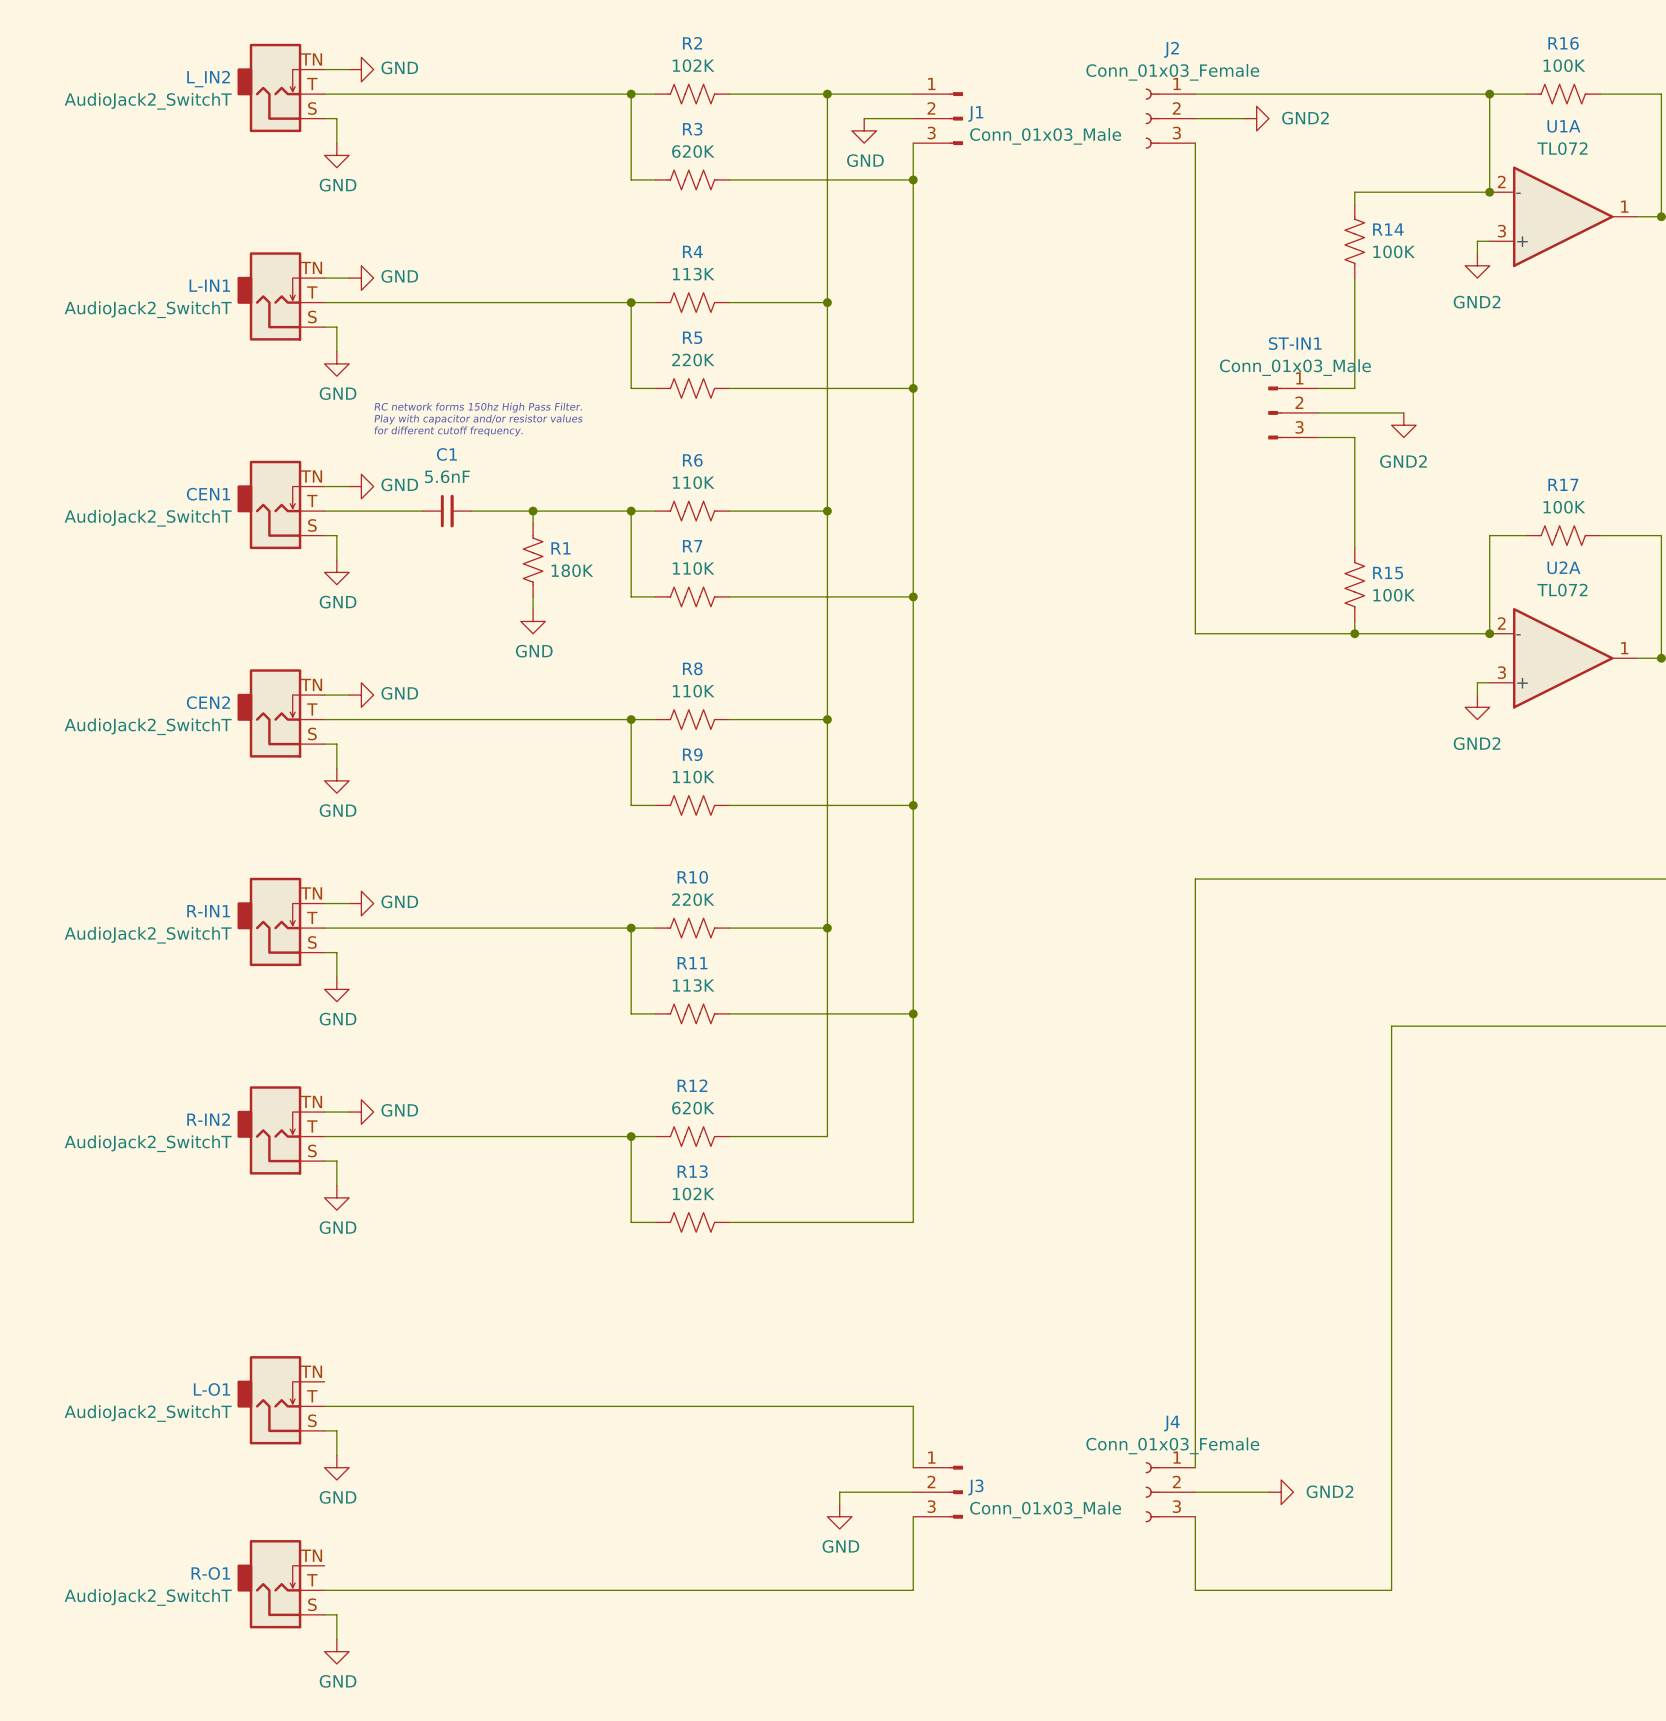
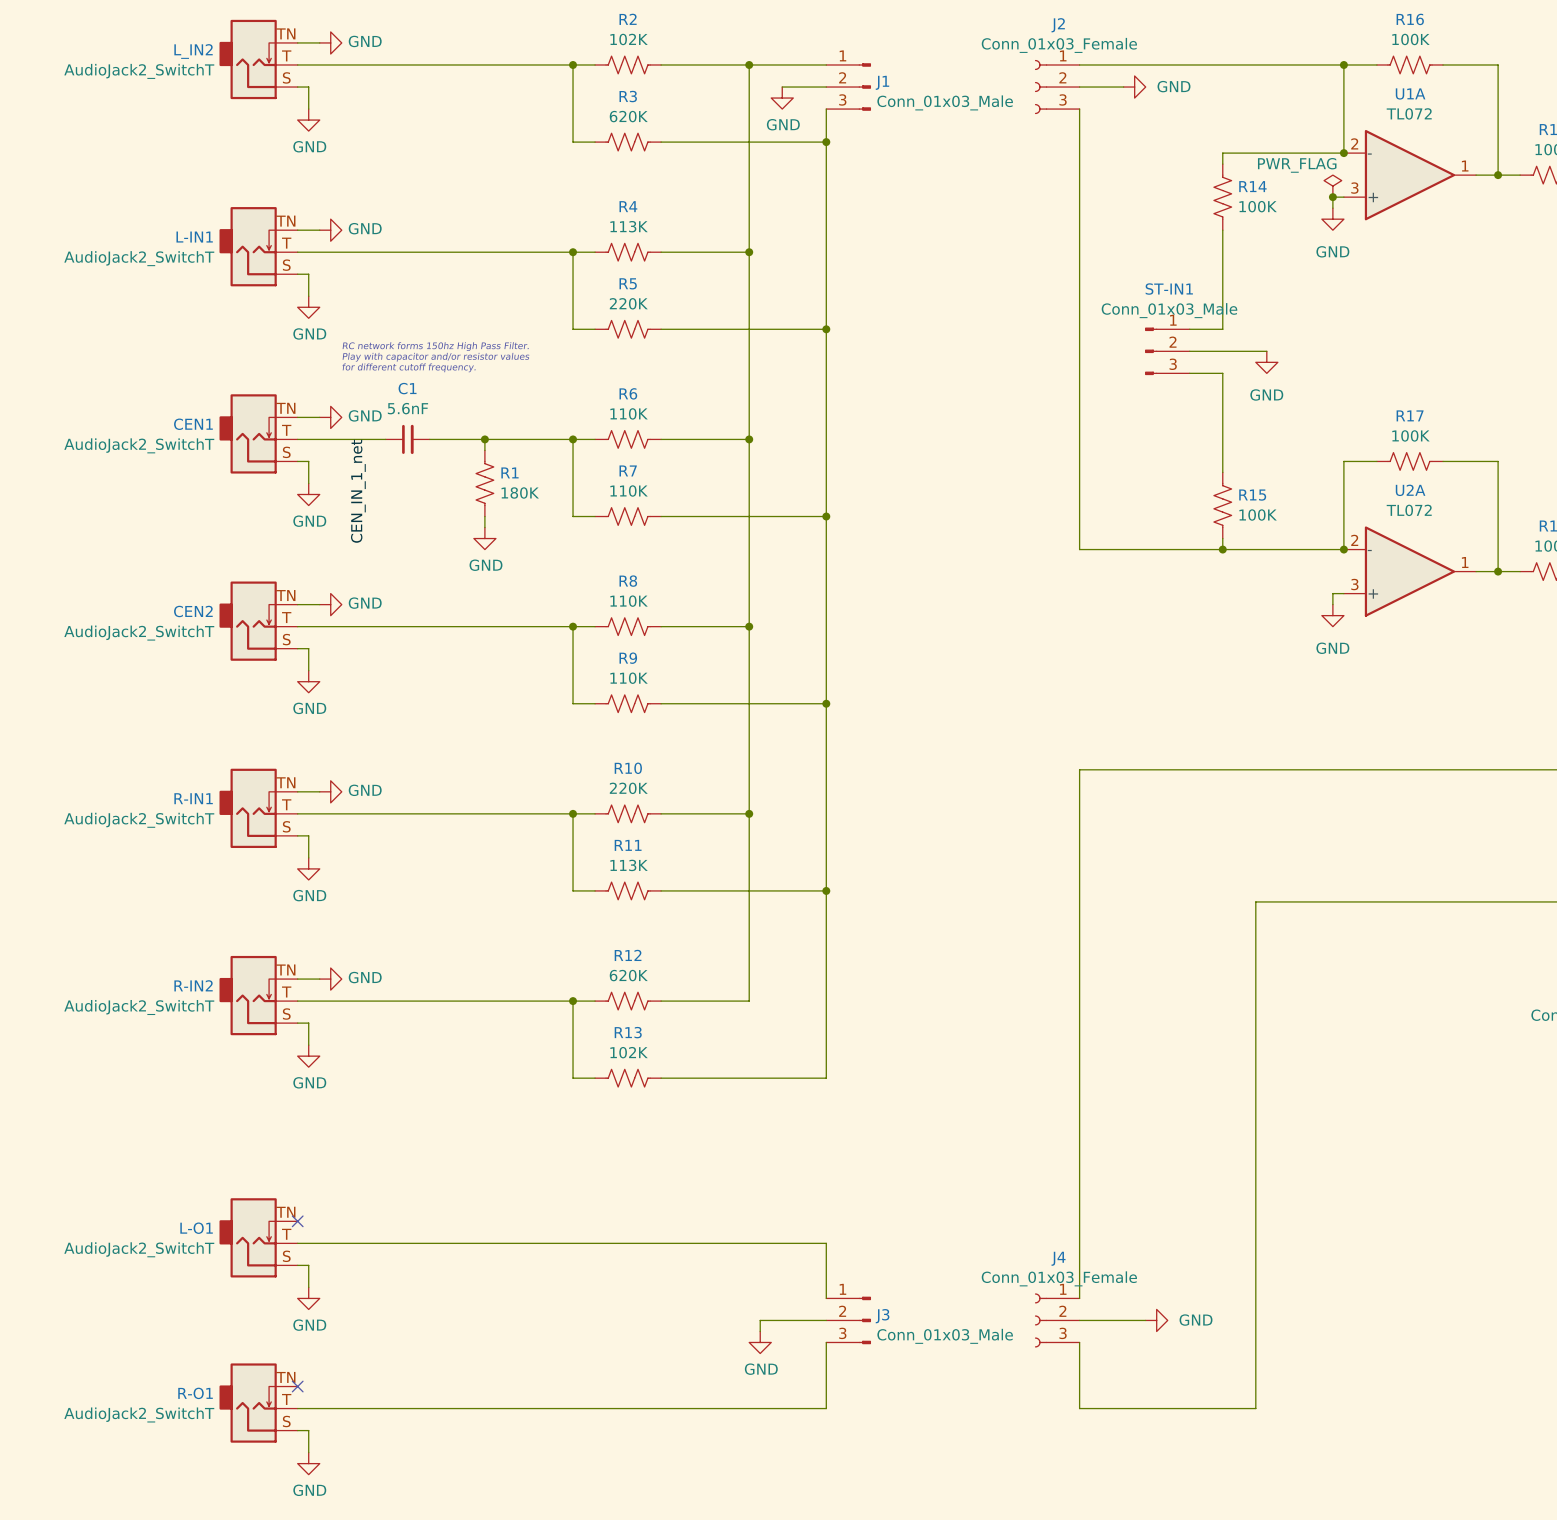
power symbol: GND2 (1256, 118) -> GND (1134, 87)
power symbol: none -> PWR_FLAG (1332, 186)
junction: none -> (1332, 197)
power symbol: GND2 (1477, 265) -> GND (1332, 219)
power symbol: GND2 (1403, 425) -> GND (1266, 362)
label: none -> CEN_IN_1_net (358, 491)
power symbol: GND2 (1477, 707) -> GND (1332, 615)
no-connect mark: none -> (297, 1221)
power symbol: GND2 (1281, 1492) -> GND (1156, 1320)
no-connect mark: none -> (297, 1386)

